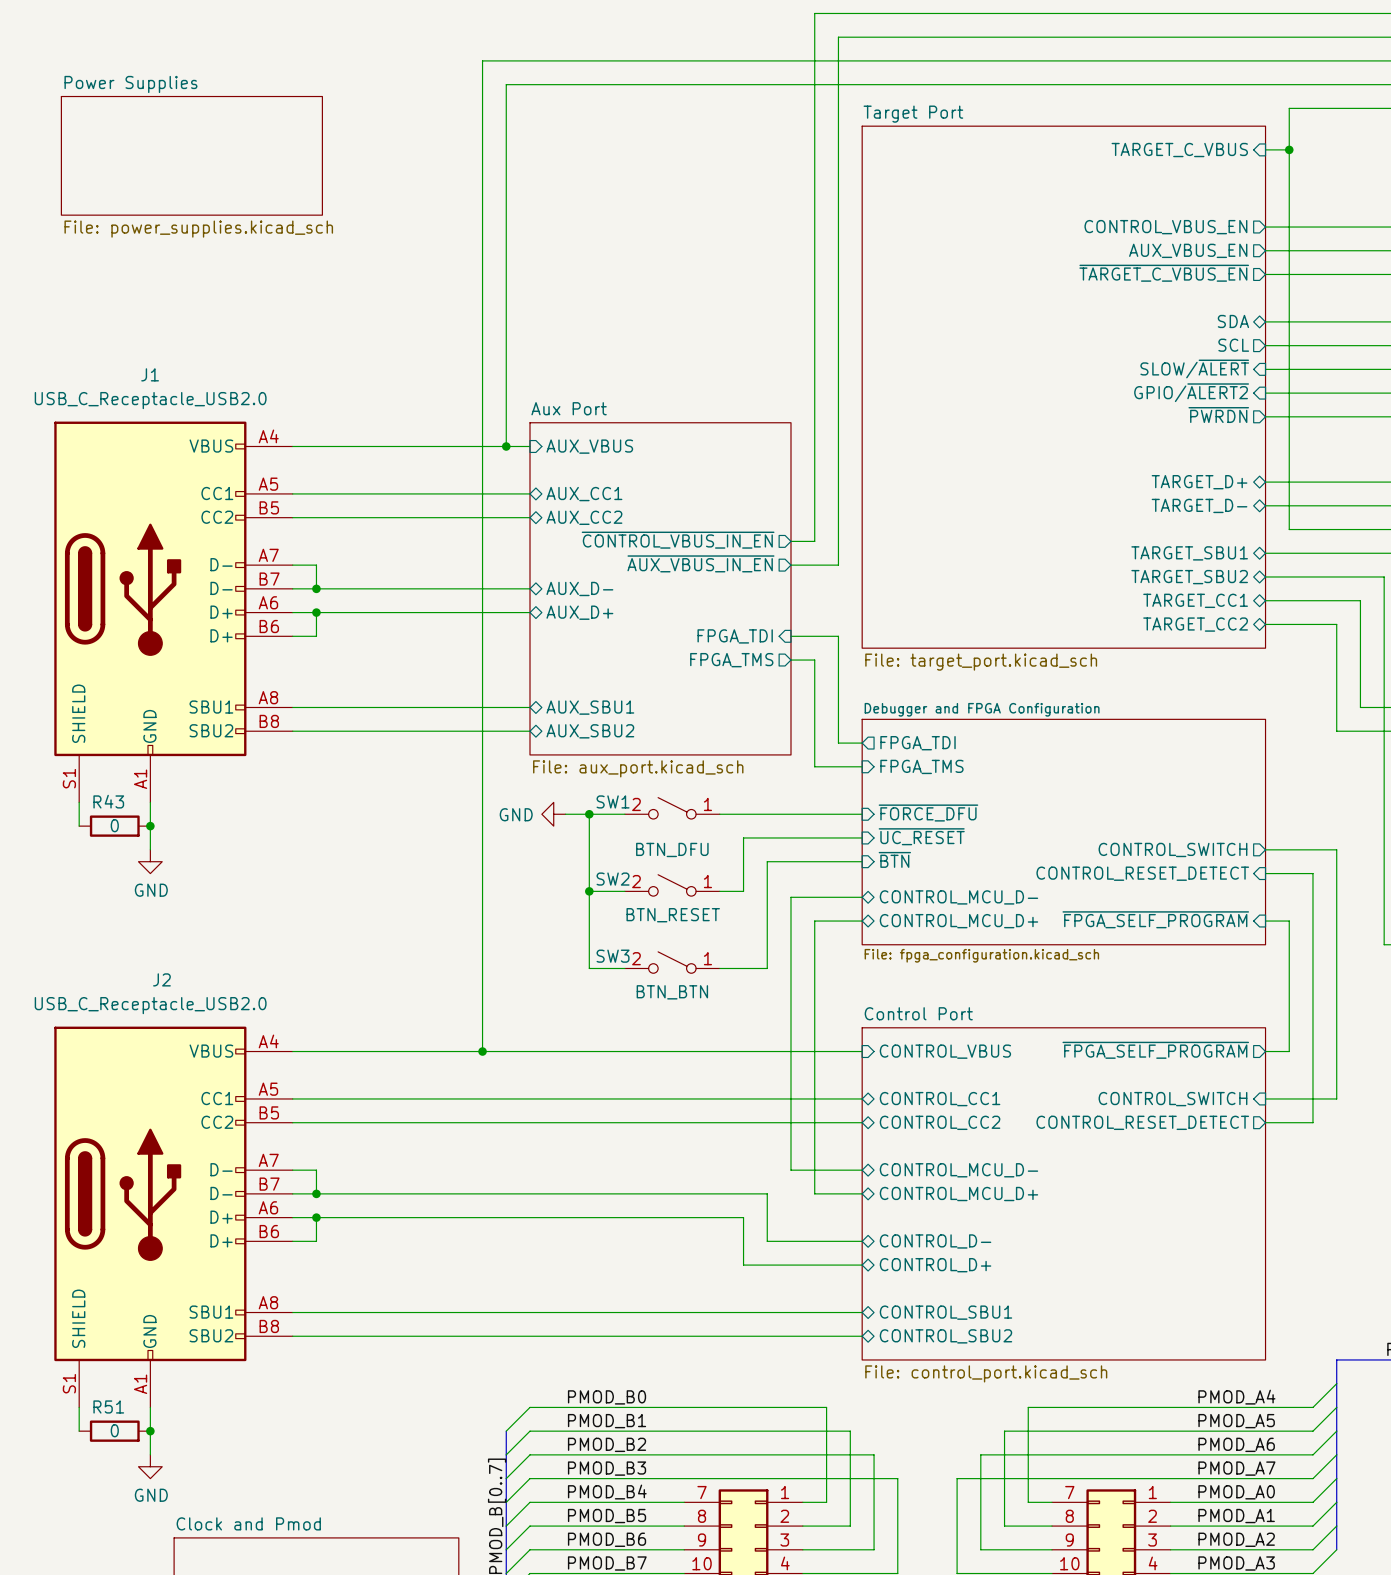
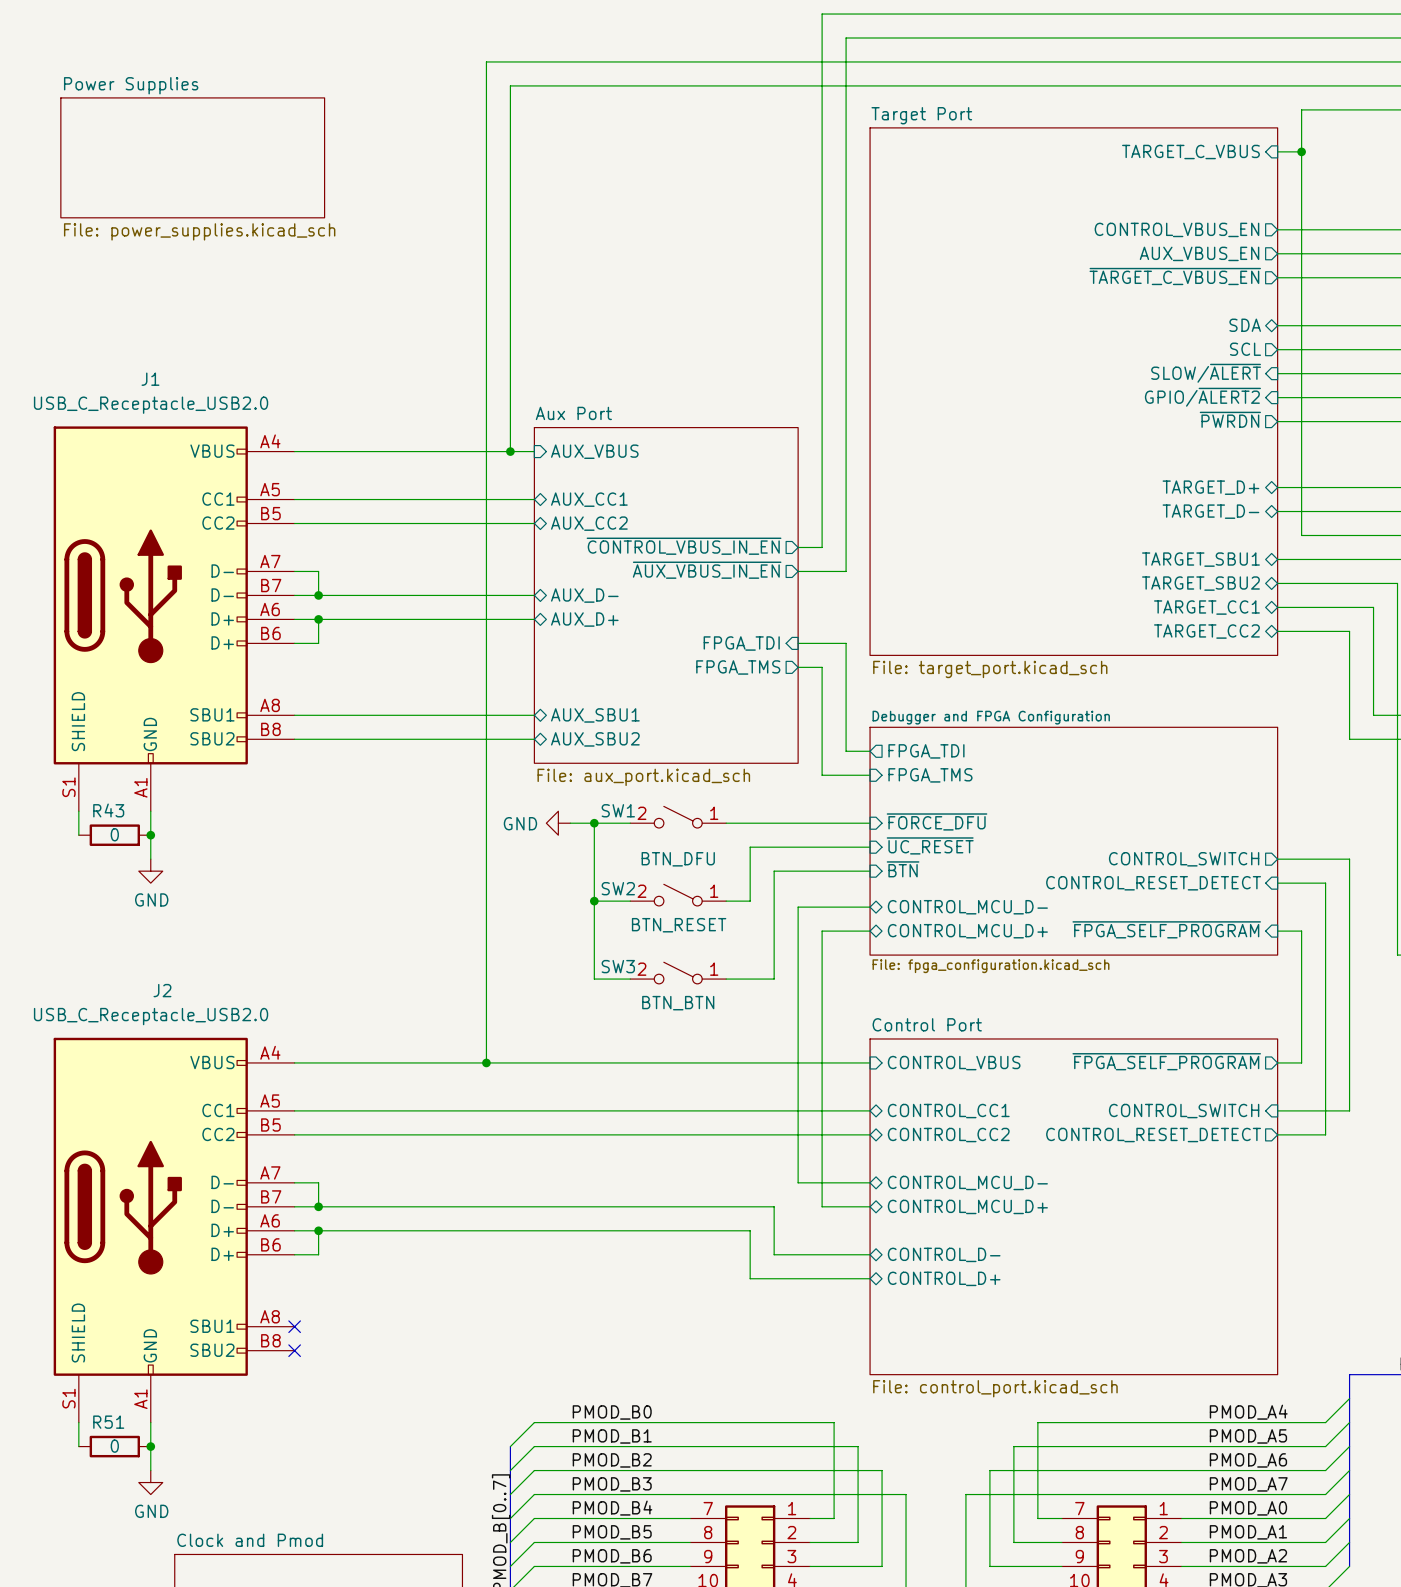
wire: (292, 1312) (862, 1312) -> none
no-connect mark: none -> (294, 1326)
sheet pin: CONTROL_SBU1 (945, 1312) -> none
wire: (292, 1336) (862, 1336) -> none
no-connect mark: none -> (294, 1350)
sheet pin: CONTROL_SBU2 (945, 1336) -> none

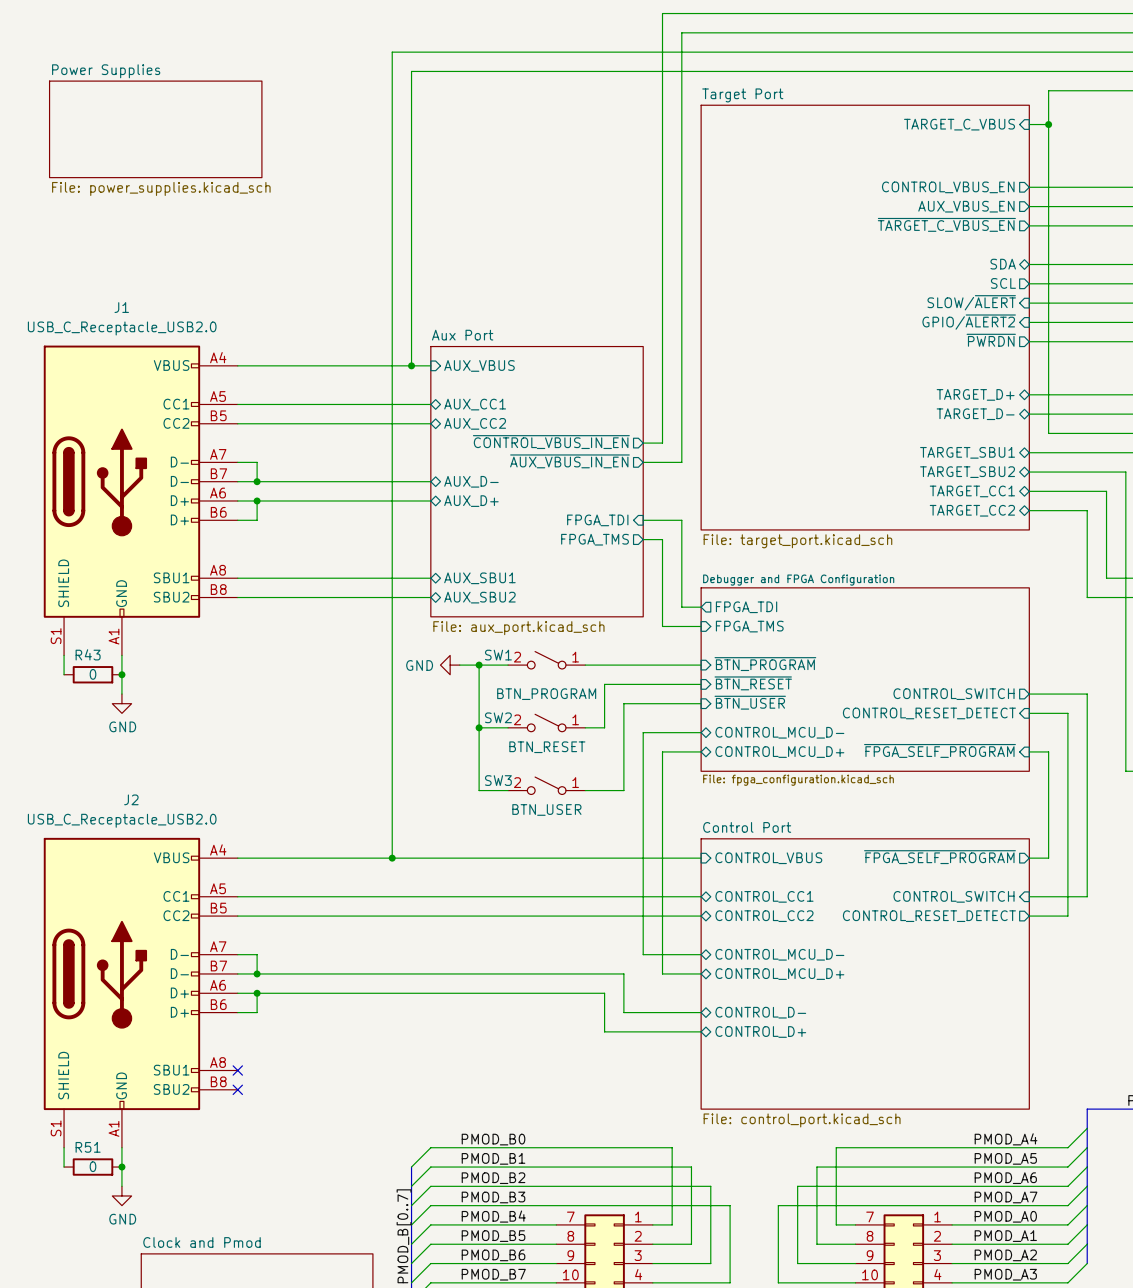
sheet pin: ~{FORCE_DFU} (937, 821) -> ~{BTN_PROGRAM} (765, 664)
sheet pin: ~{UC_RESET} (930, 845) -> ~{BTN_RESET} (753, 683)
SW1 value: BTN_DFU (678, 859) -> BTN_PROGRAM (546, 694)
sheet pin: ~{BTN} (903, 869) -> ~{BTN_USER} (750, 702)
SW3 value: BTN_BTN (678, 1003) -> BTN_USER (546, 809)

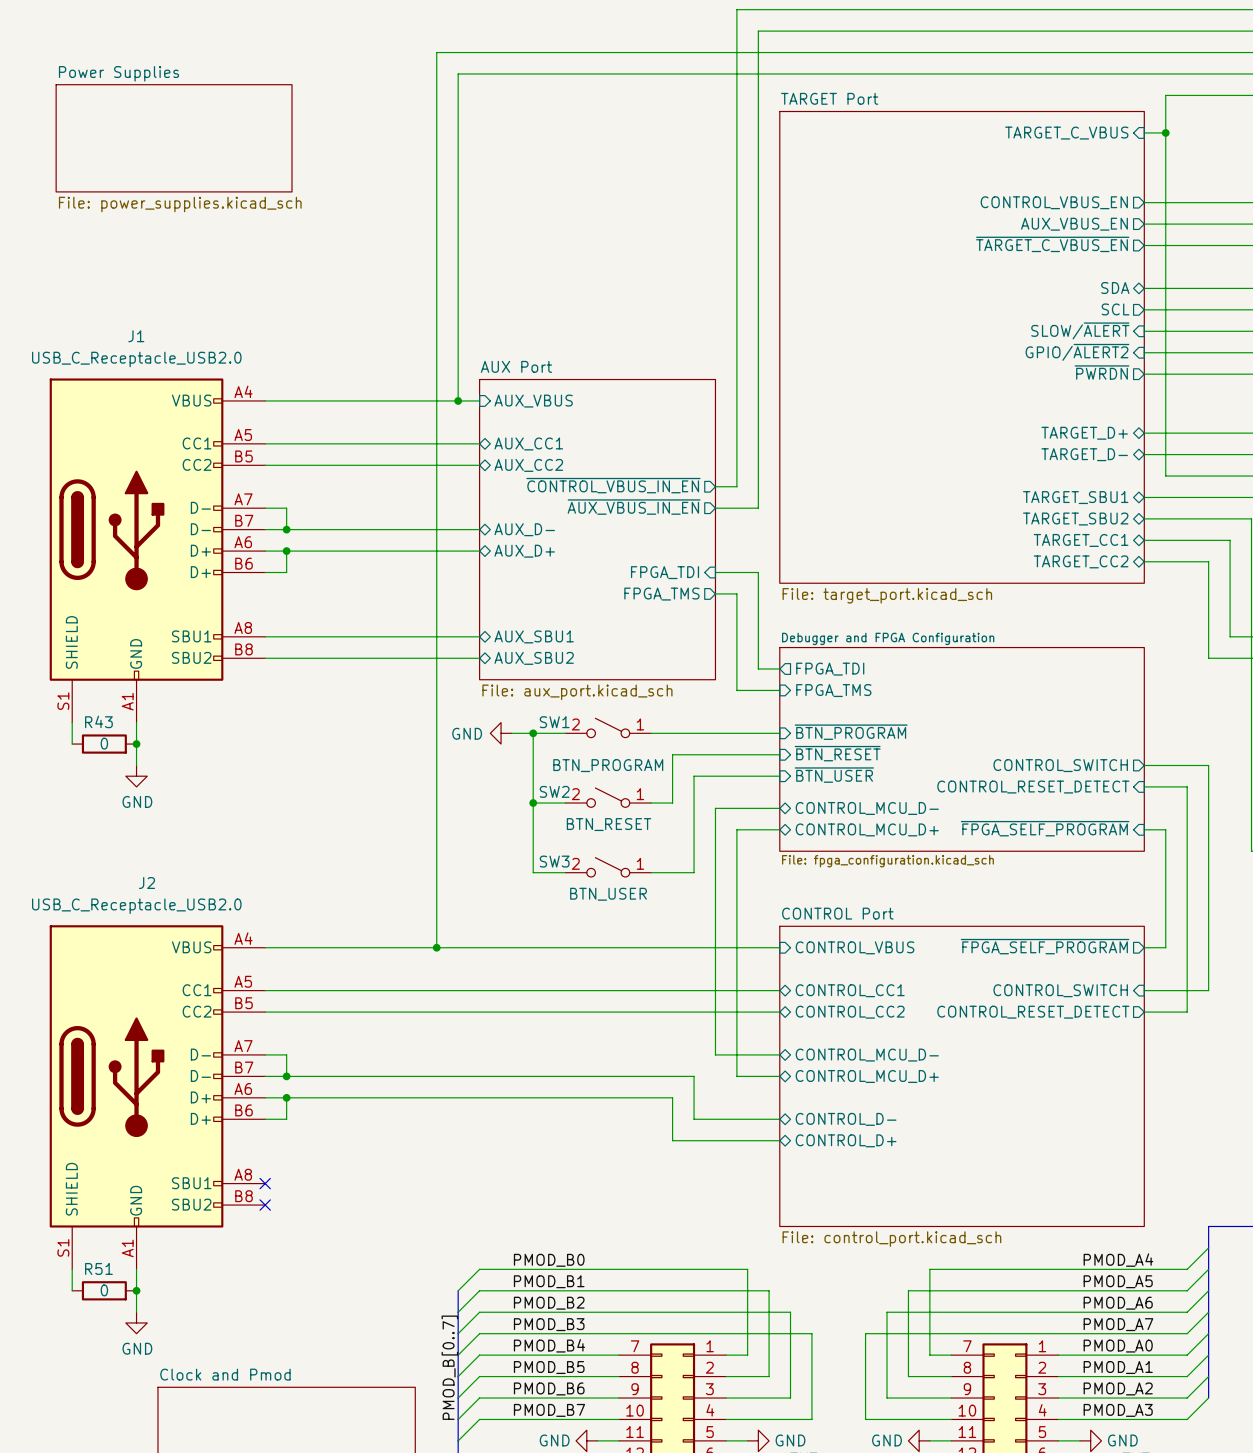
sheet Target Port name: Target Port (742, 95) -> TARGET Port (829, 98)
sheet Aux Port name: Aux Port (462, 335) -> AUX Port (516, 366)
sheet Control Port name: Control Port (747, 827) -> CONTROL Port (837, 913)

